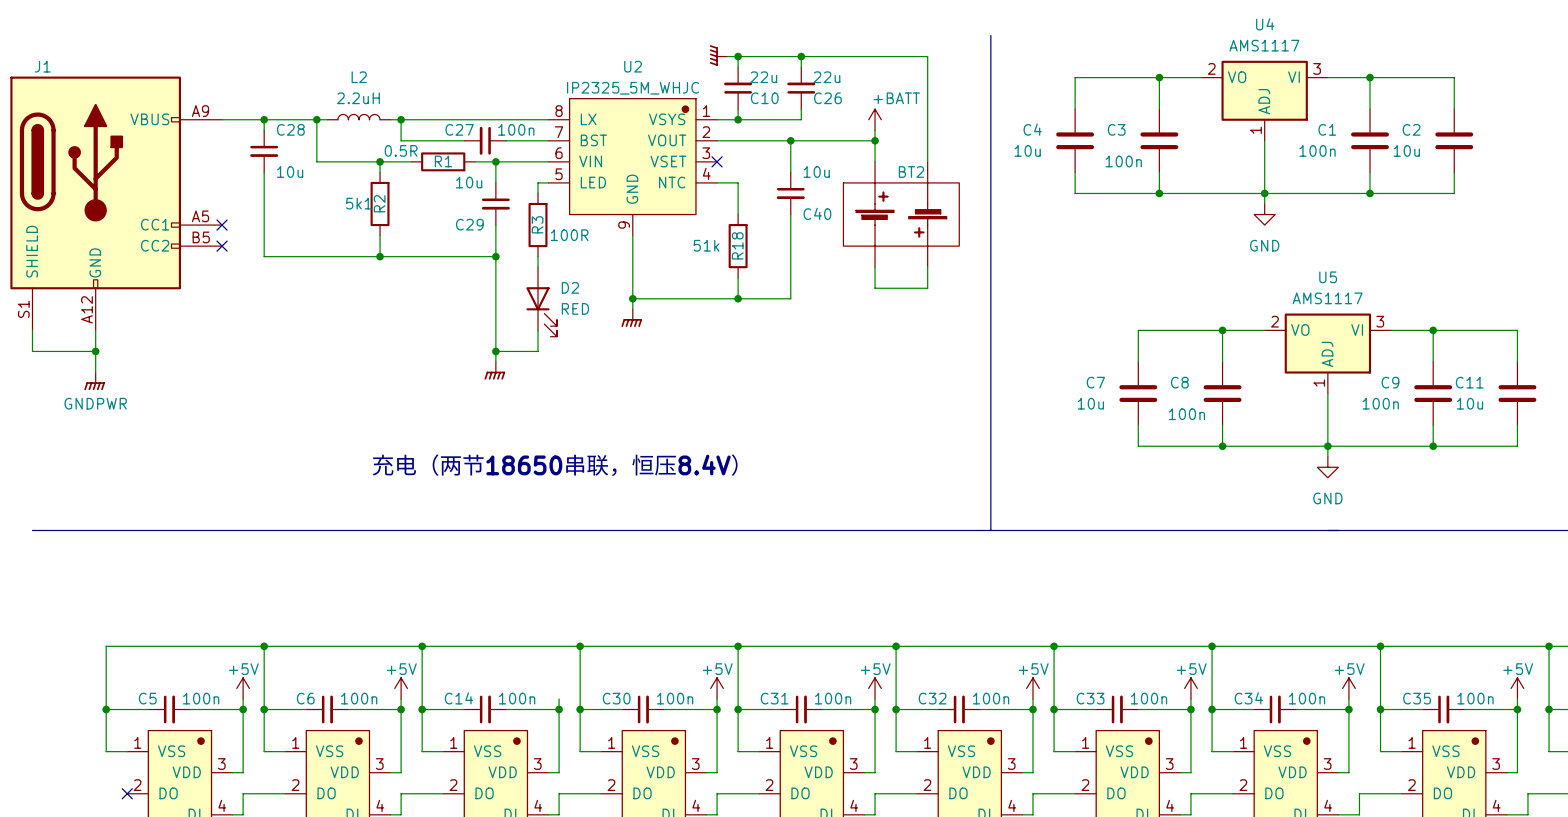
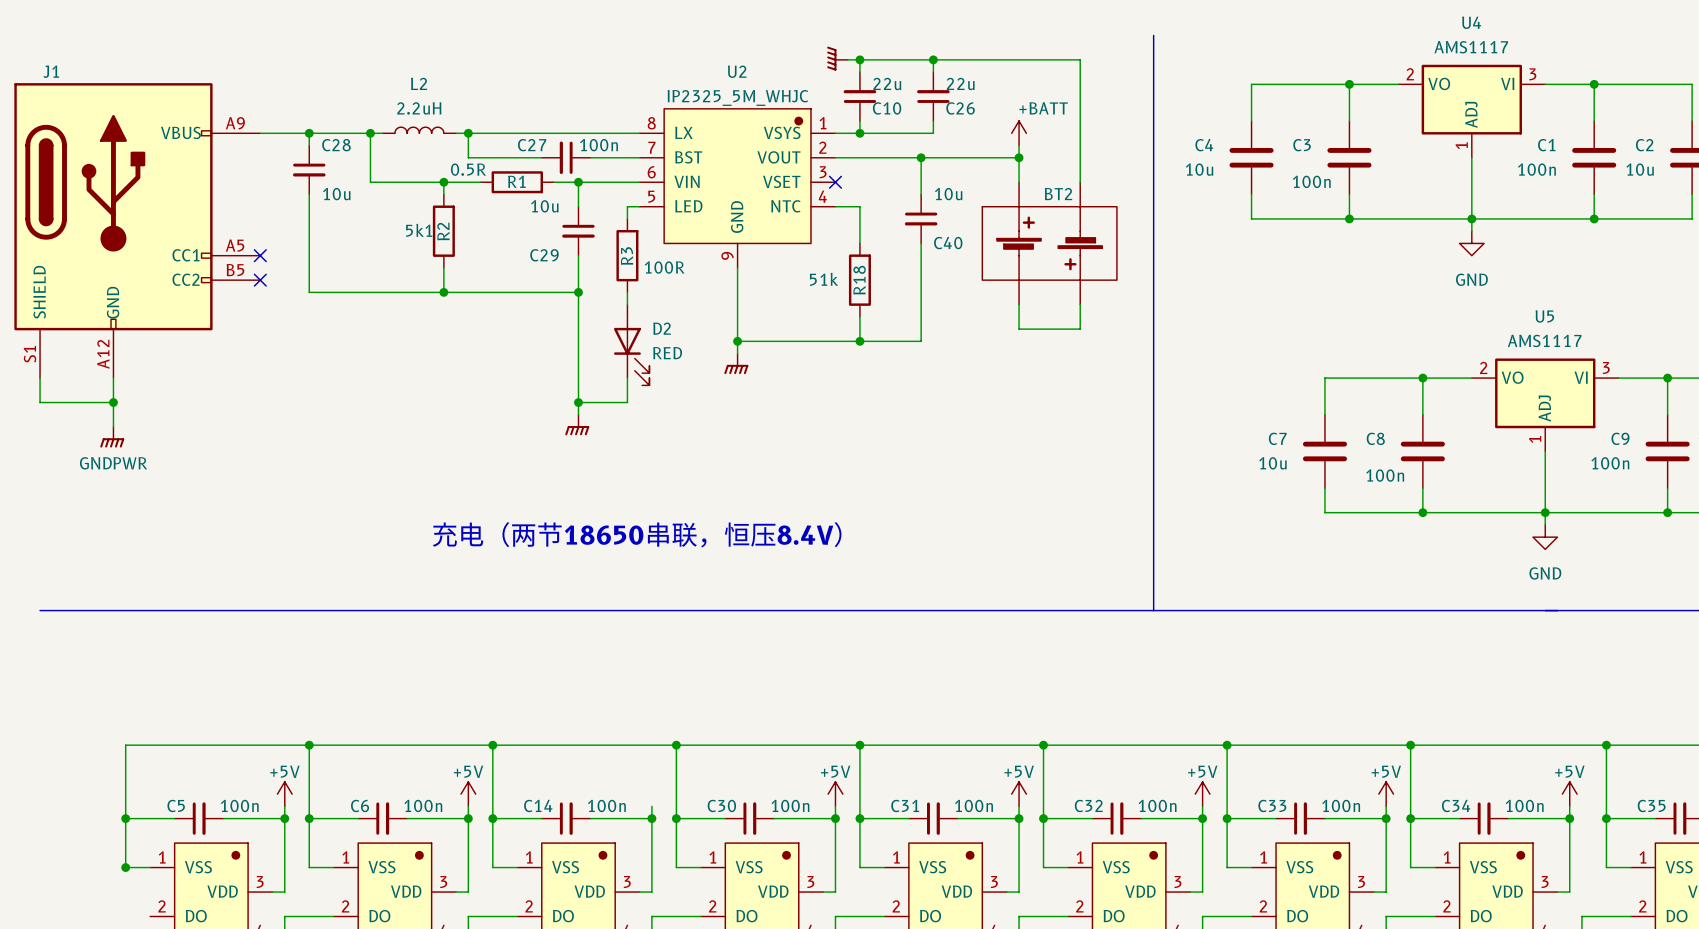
junction: none -> (125, 867)
no-connect mark: (127, 793) -> none

